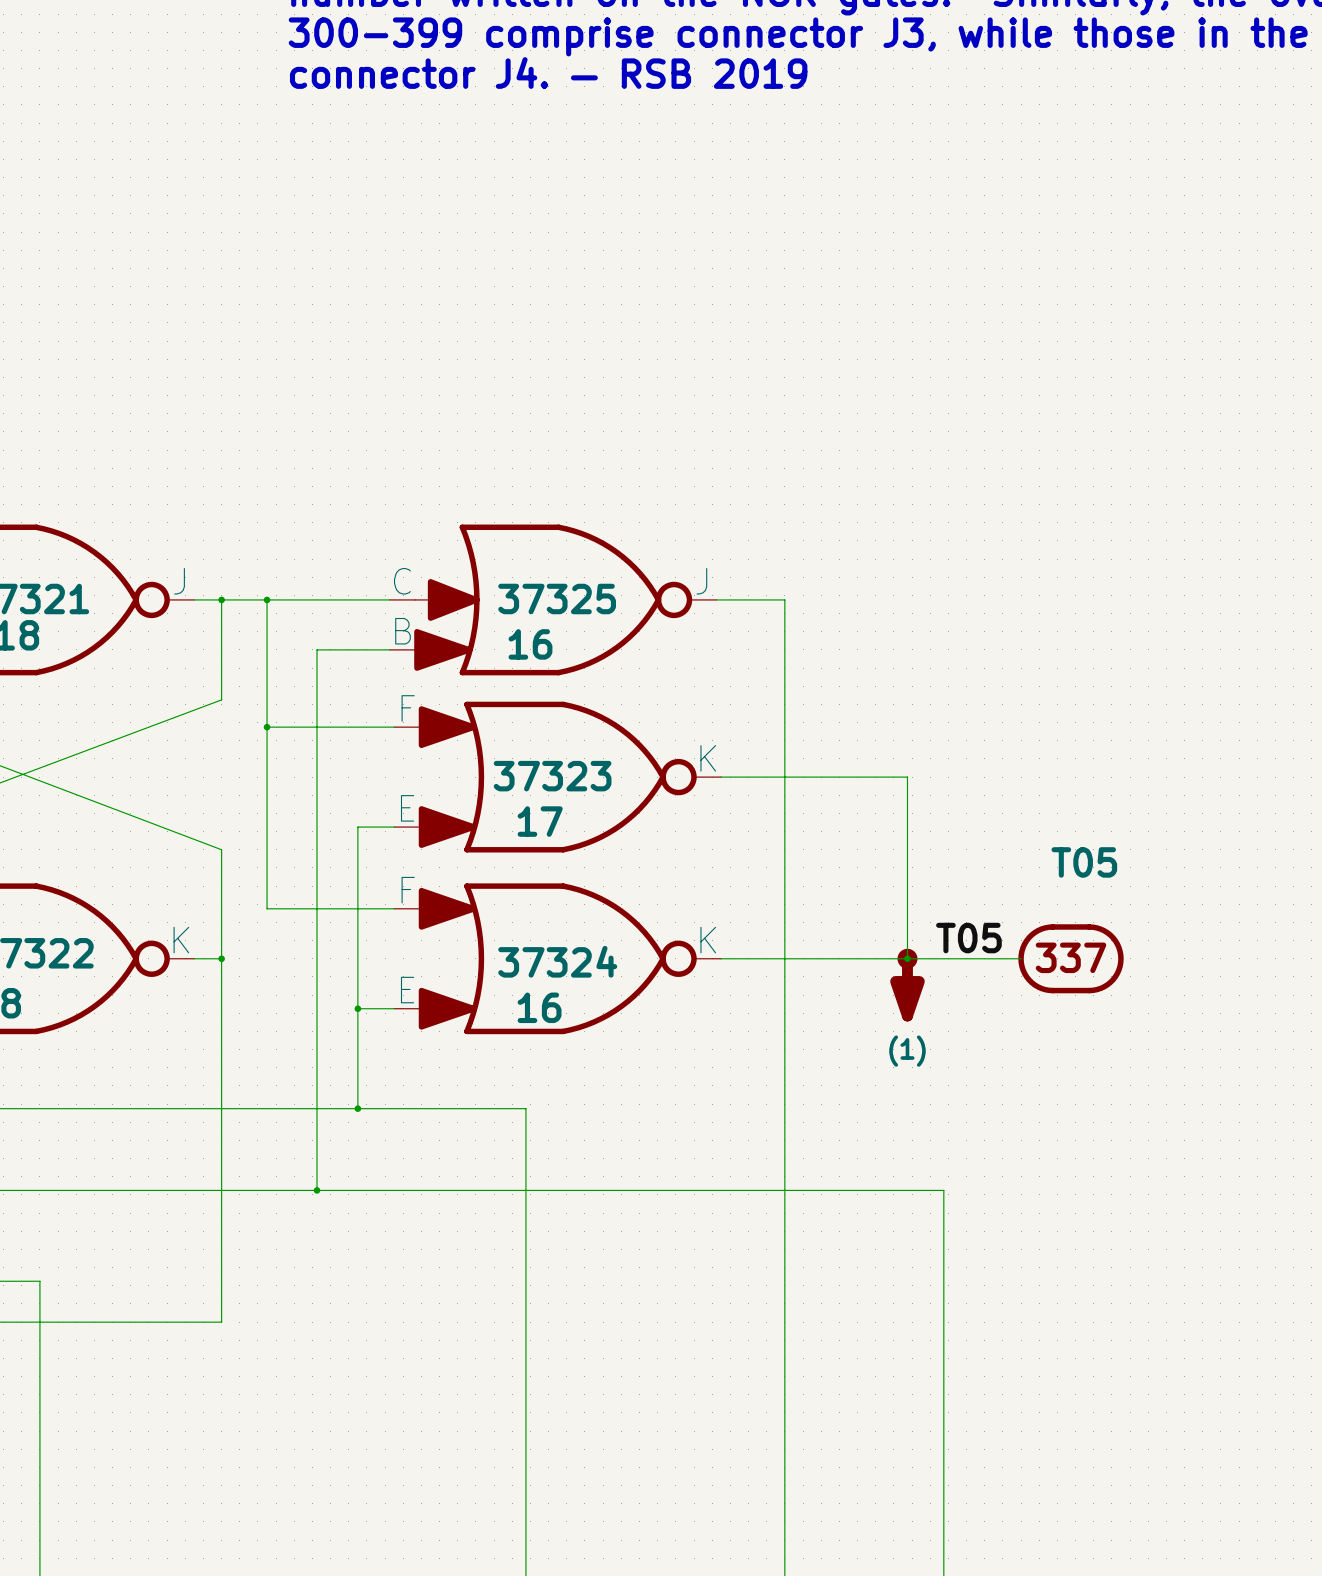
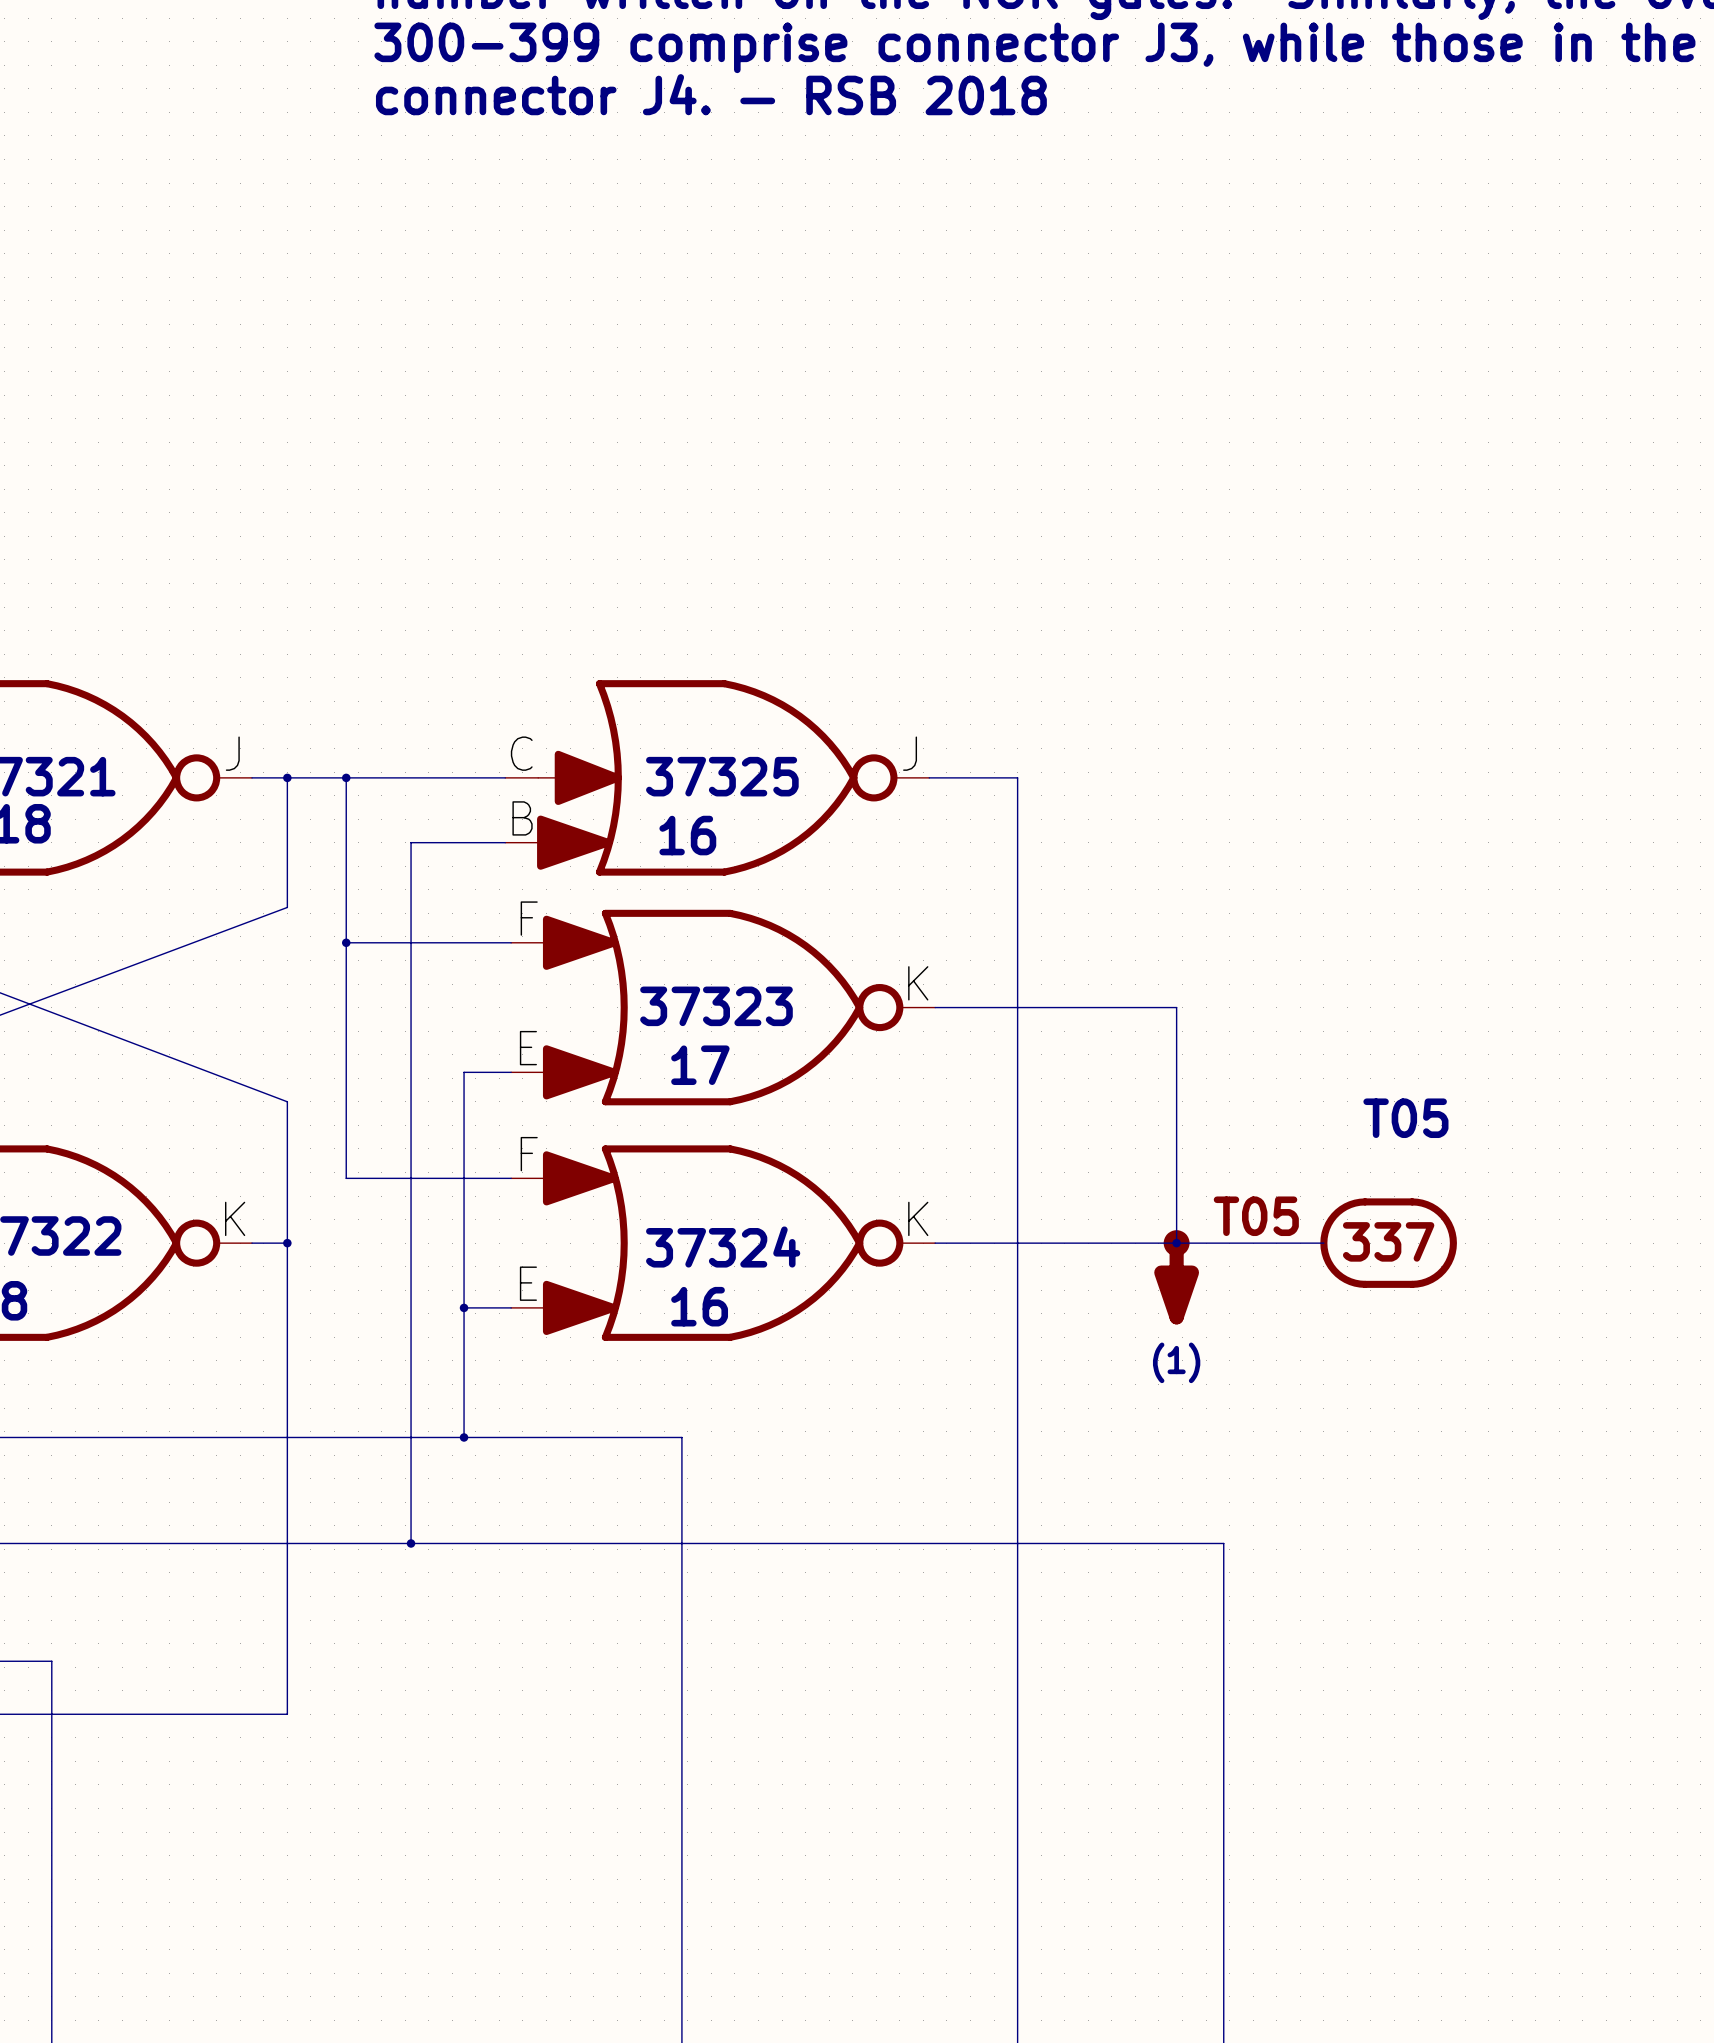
text: connector J4. — RSB 2019 (548, 73) -> connector J4. — RSB 2018 (711, 94)

